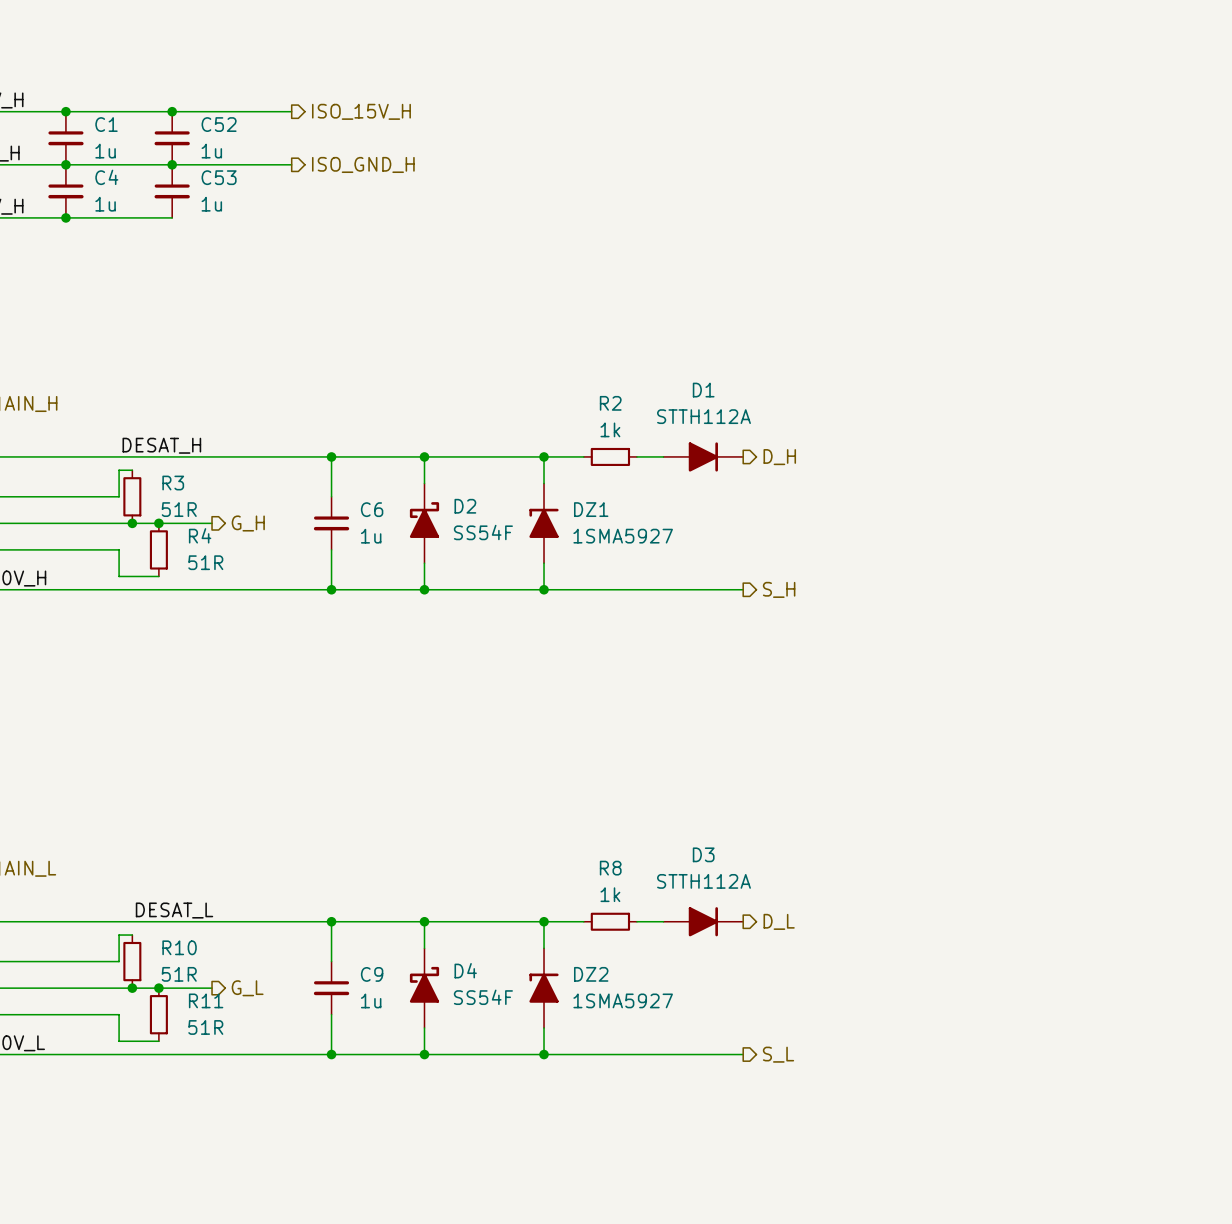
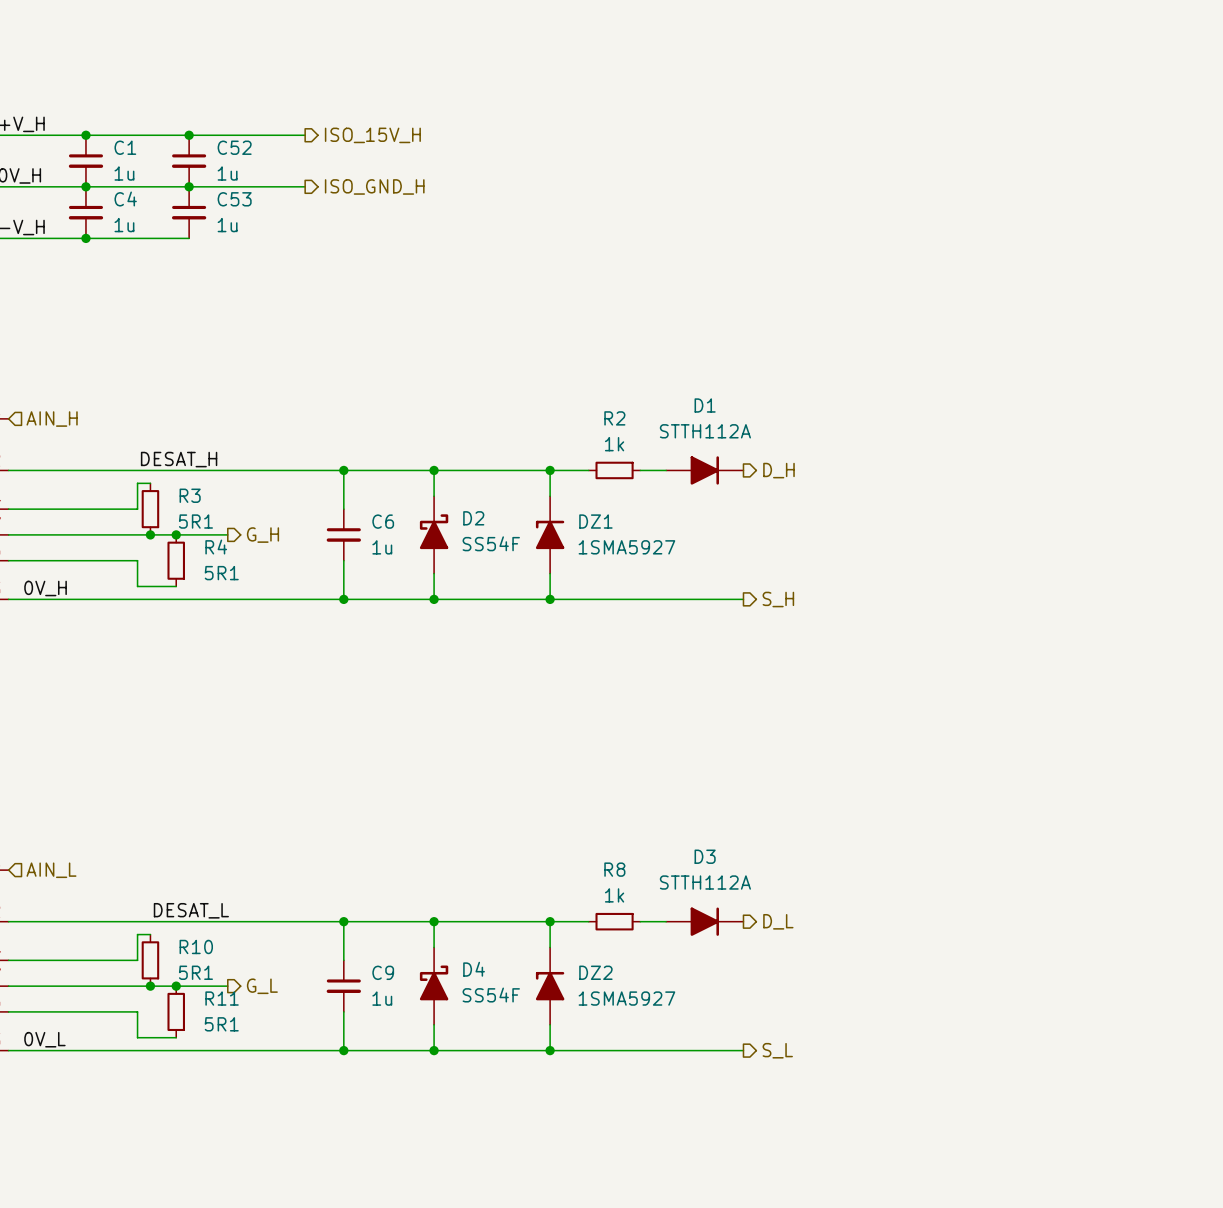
R3 value: 51R (179, 509) -> 5R1 (195, 521)
R4 value: 51R (205, 562) -> 5R1 (221, 573)
R10 value: 51R (179, 974) -> 5R1 (195, 972)
R11 value: 51R (205, 1027) -> 5R1 (221, 1024)

